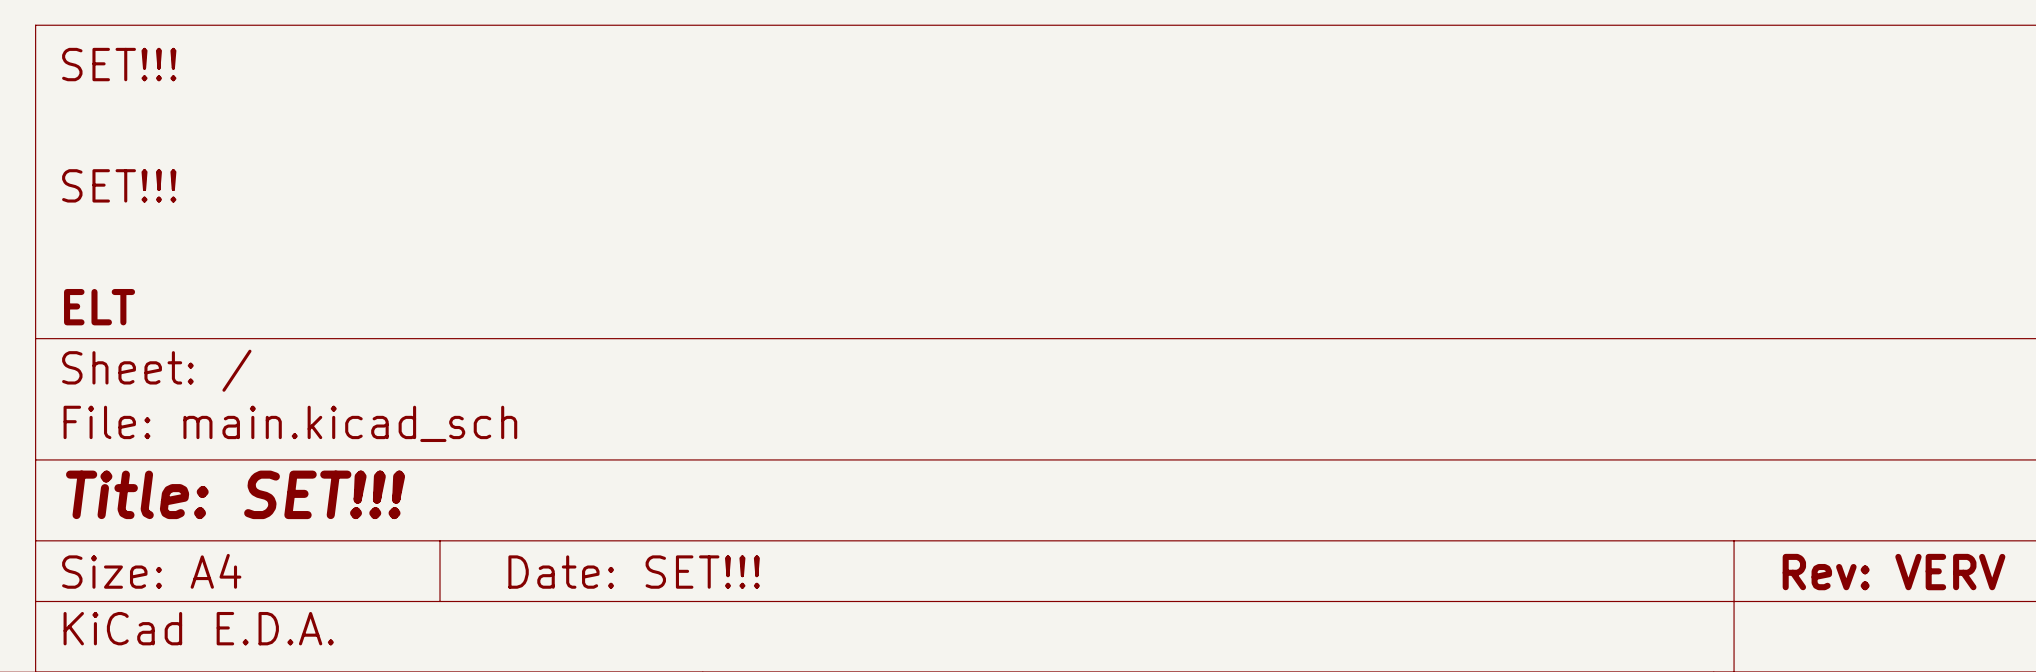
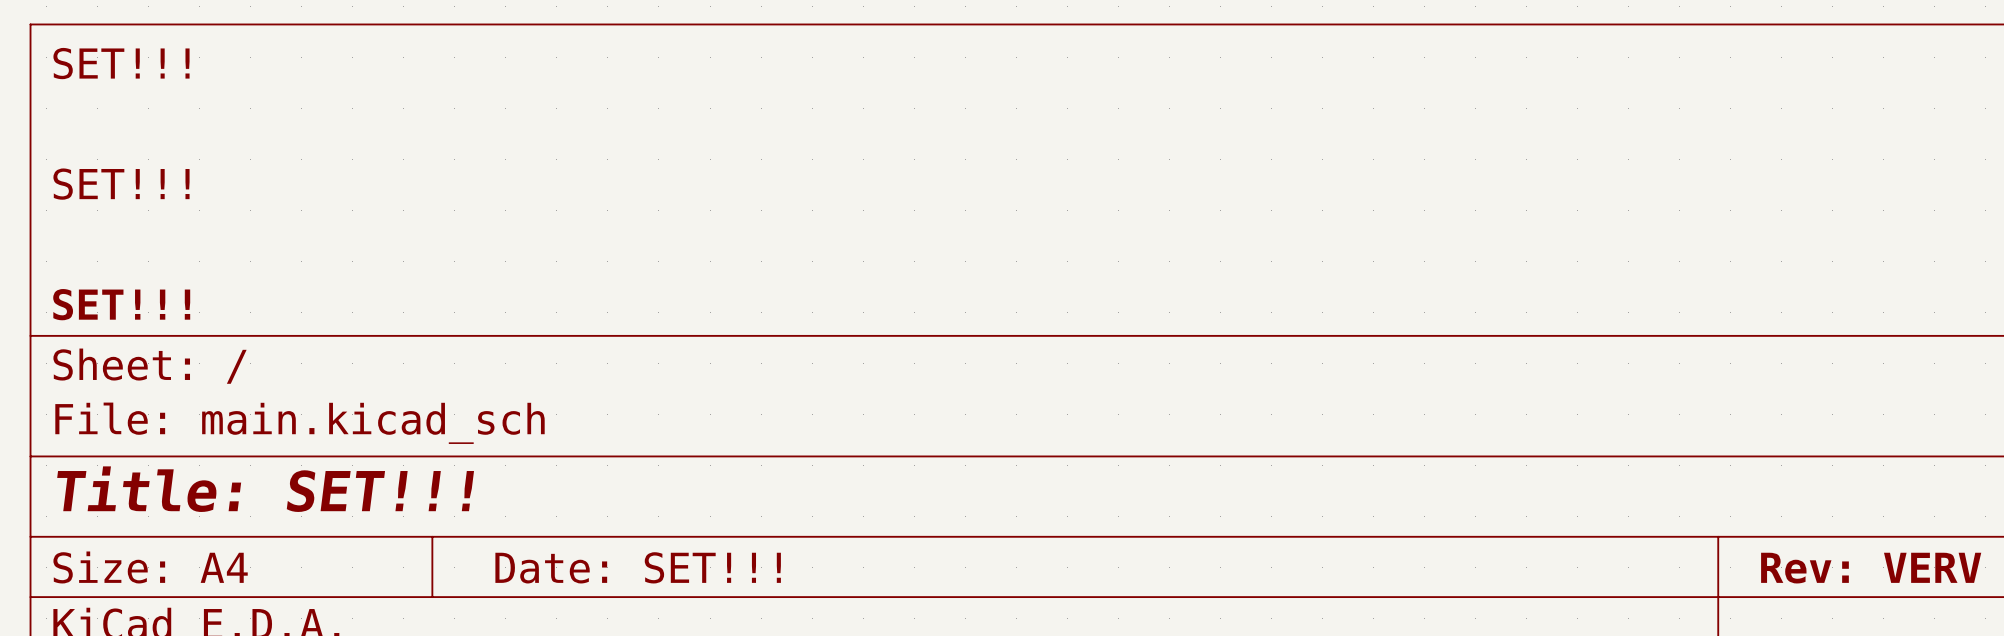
title block: ELT (99, 307) -> SET!!! (121, 304)

